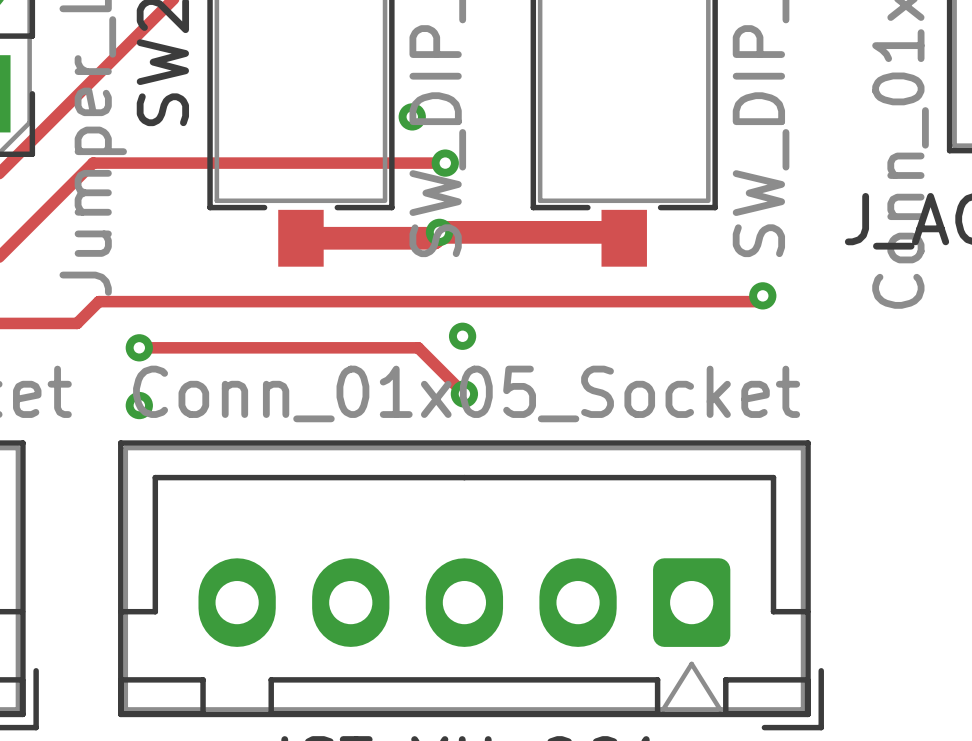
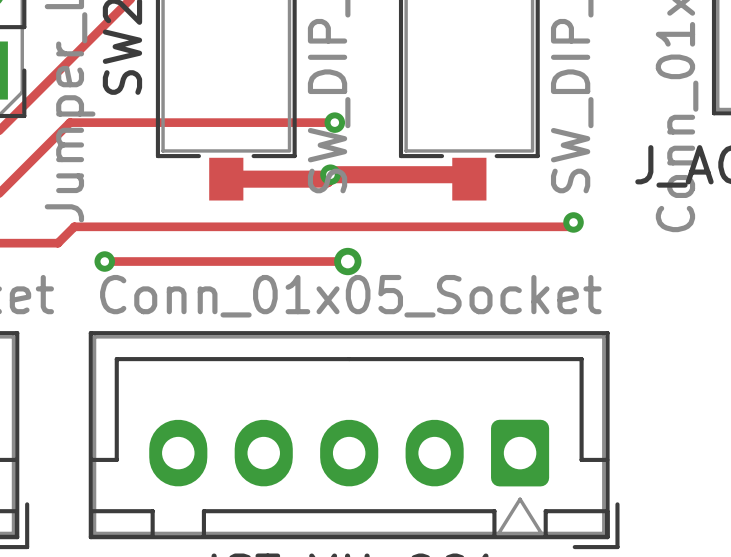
via: (412, 116) -> none
via size: [448, 322, 477, 350] -> [334, 247, 362, 276]
track: (418, 347) (464, 394) -> (314, 261) (347, 261)
via: (464, 394) -> none
via: (139, 405) -> none

